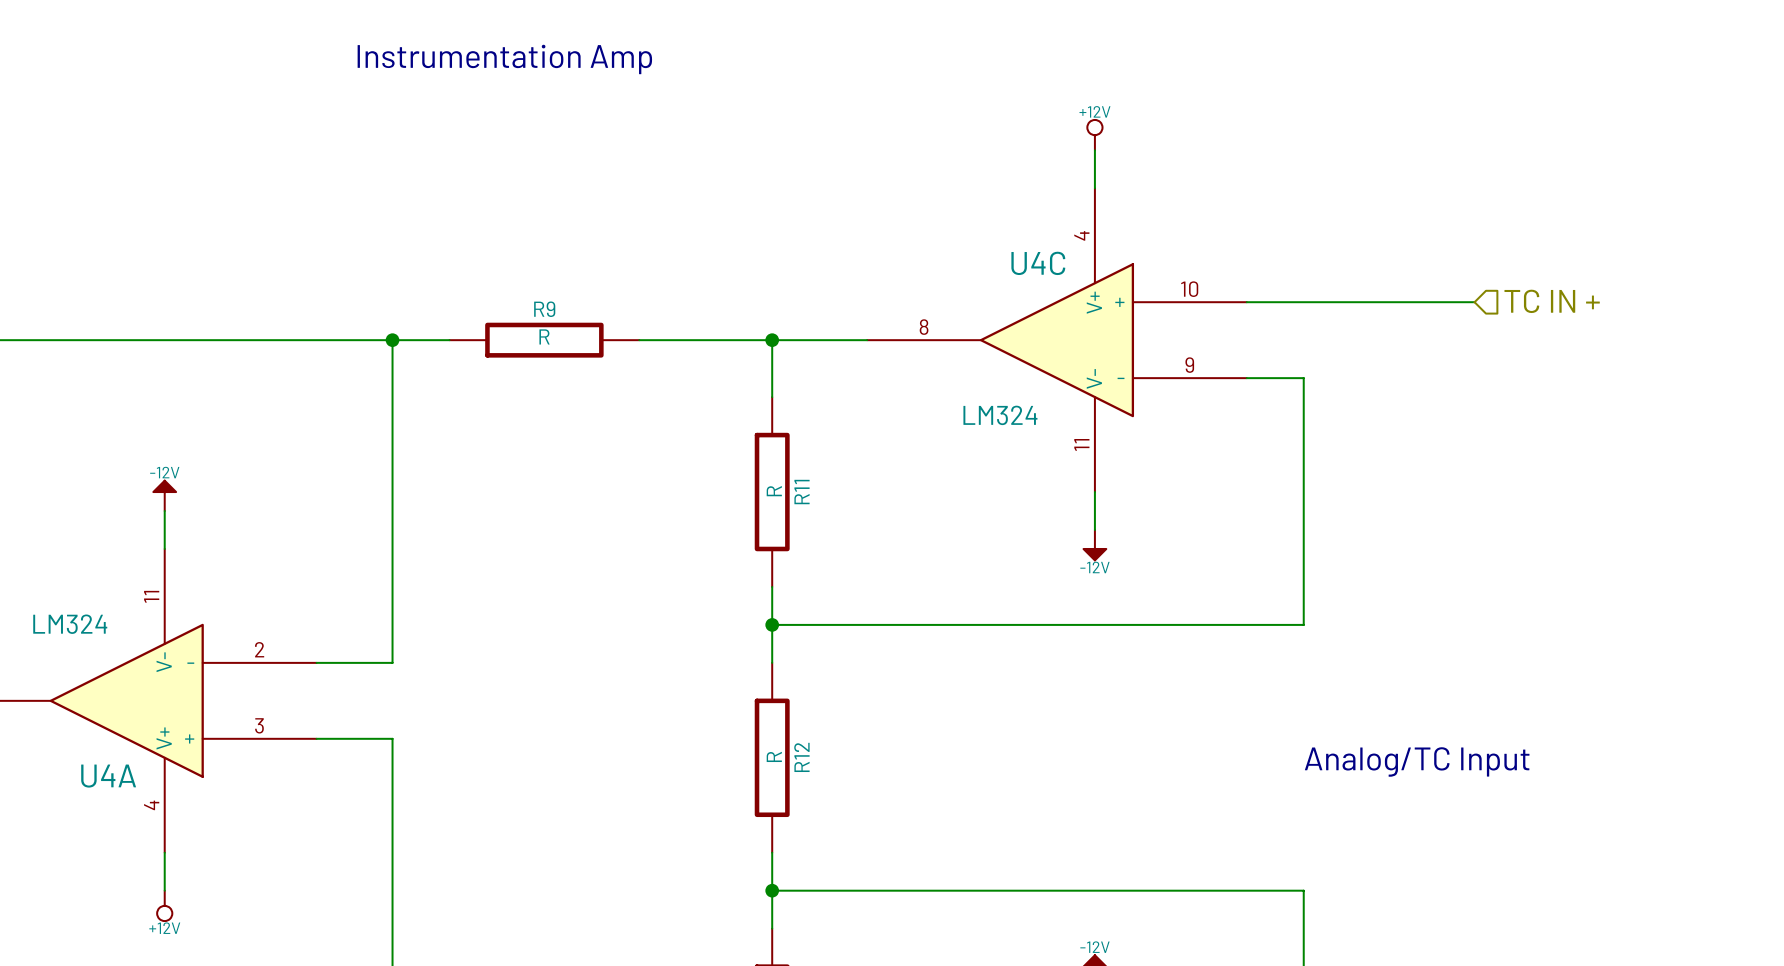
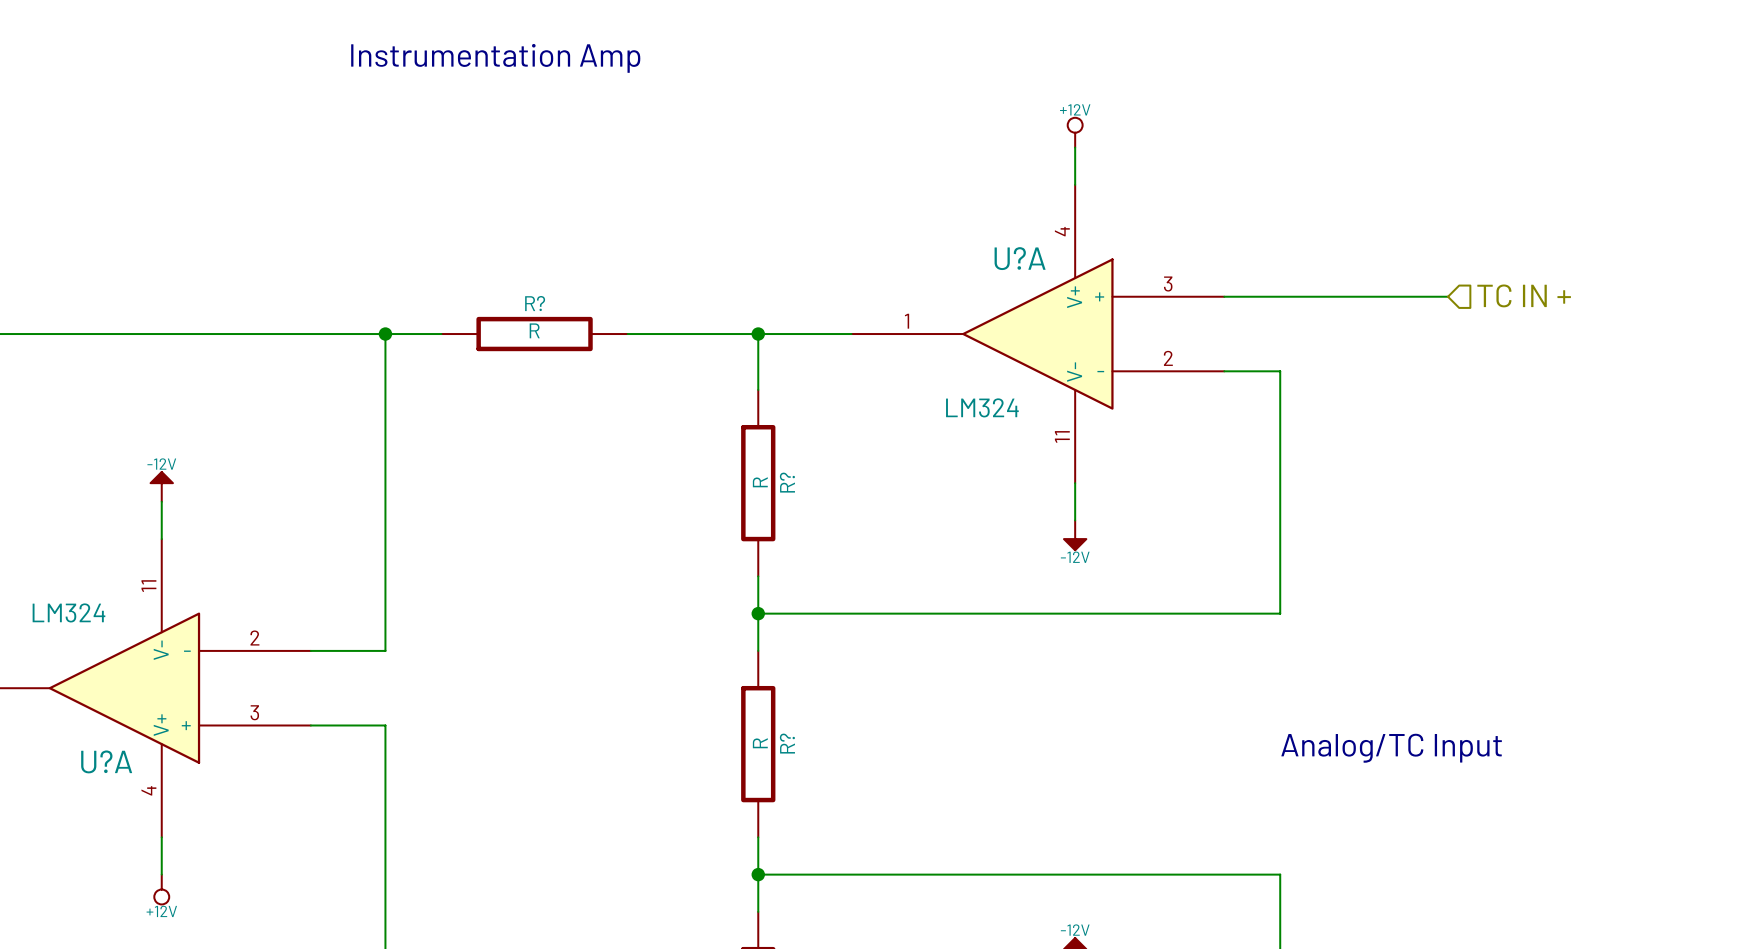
U4C name: U4C (1038, 263) -> U?A (1020, 258)
U4C pin number: 10 (1189, 289) -> 3 (1168, 284)
R9 name: R9 (544, 309) -> R? (535, 303)
U4C pin number: 8 (924, 327) -> 1 (907, 321)
U4C pin number: 9 (1189, 365) -> 2 (1168, 358)
R11 name: R11 (802, 492) -> R? (787, 482)
R12 name: R12 (801, 757) -> R? (787, 743)
U4A name: U4A (108, 776) -> U?A (106, 761)

